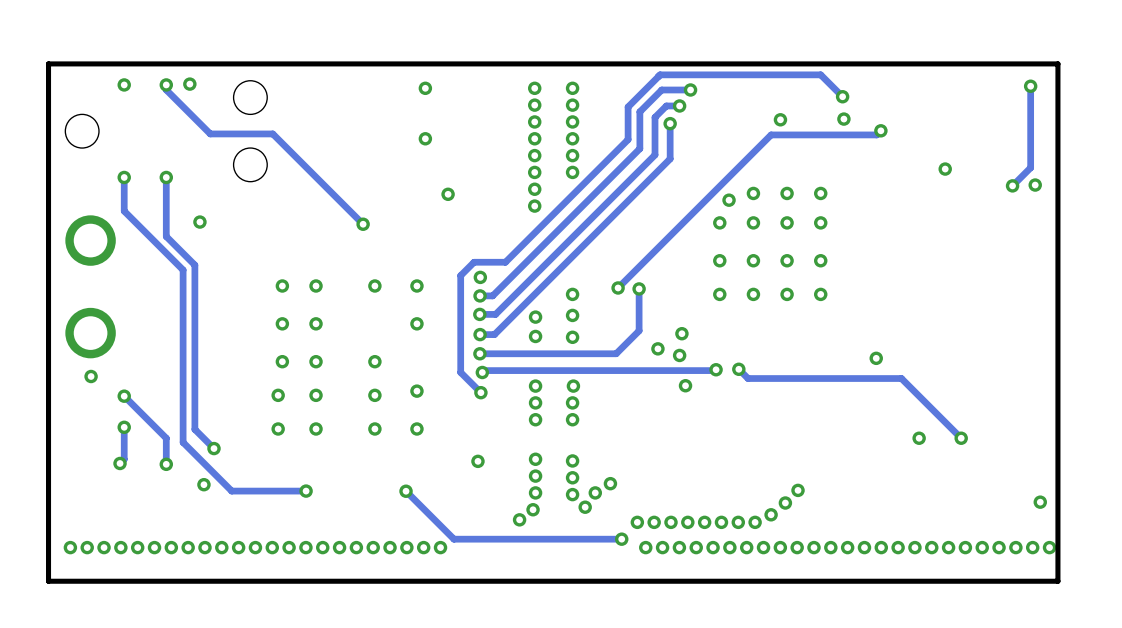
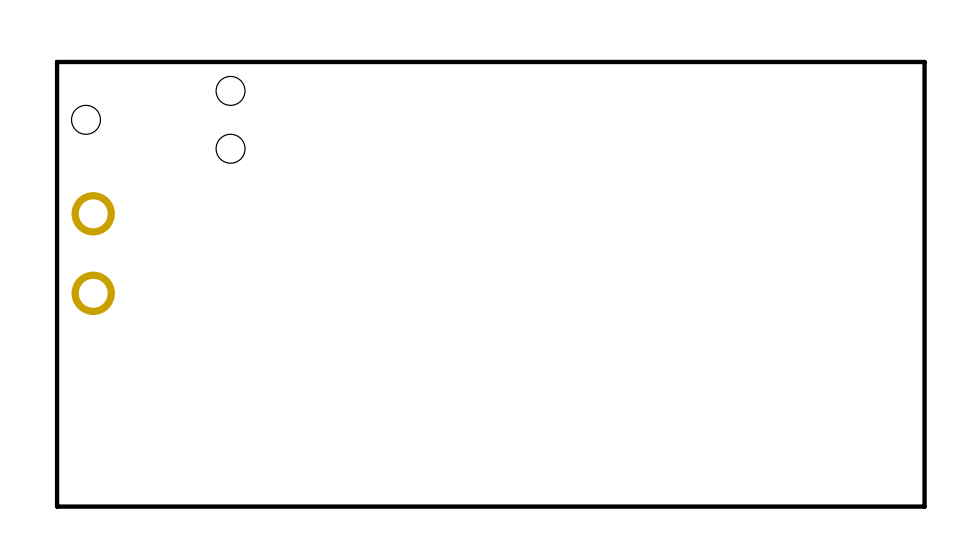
via: (124, 84) -> none
track: (166, 84) (166, 89) (210, 133) (272, 133) (363, 224) -> none
via: (166, 84) -> none
via: (189, 84) -> none
track: (1030, 86) (1030, 167) (1012, 185) -> none
via: (1030, 86) -> none
via: (425, 88) -> none
via: (534, 88) -> none
via: (572, 88) -> none
track: (690, 89) (661, 89) (639, 111) (639, 148) (492, 295) (480, 295) -> none
via: (690, 89) -> none
track: (842, 96) (820, 74) (660, 74) (628, 106) (628, 139) (505, 262) (474, 262) (460, 275) (460, 372) (480, 392) -> none
via: (842, 96) -> none
via: (534, 105) -> none
via: (572, 105) -> none
track: (679, 105) (666, 105) (655, 117) (655, 154) (495, 314) (479, 314) -> none
via: (679, 105) -> none
via: (780, 119) -> none
via: (843, 119) -> none
via: (534, 121) -> none
via: (572, 121) -> none
track: (670, 123) (670, 158) (494, 334) (480, 334) -> none
via: (670, 123) -> none
track: (880, 130) (876, 134) (771, 134) (618, 287) -> none
via: (880, 130) -> none
via: (425, 138) -> none
via: (534, 138) -> none
via: (572, 138) -> none
via: (534, 155) -> none
via: (572, 155) -> none
via: (945, 169) -> none
via: (534, 172) -> none
via: (572, 172) -> none
track: (124, 177) (124, 211) (183, 270) (183, 442) (231, 491) (306, 491) -> none
via: (124, 177) -> none
track: (166, 177) (166, 236) (194, 265) (194, 429) (214, 448) -> none
via: (166, 177) -> none
via: (1012, 185) -> none
via: (1035, 185) -> none
via: (534, 189) -> none
via: (753, 193) -> none
via: (787, 193) -> none
via: (820, 193) -> none
via: (448, 194) -> none
via: (729, 200) -> none
via: (534, 206) -> none
via: (199, 222) -> none
via: (719, 222) -> none
via: (753, 222) -> none
via: (787, 222) -> none
via: (820, 222) -> none
via: (363, 224) -> none
via: (719, 260) -> none
via: (753, 260) -> none
via: (787, 260) -> none
via: (820, 260) -> none
via: (480, 277) -> none
via: (282, 285) -> none
via: (316, 285) -> none
via: (374, 285) -> none
via: (416, 285) -> none
via: (618, 287) -> none
track: (639, 288) (639, 330) (616, 353) (479, 353) -> none
via: (639, 288) -> none
via: (572, 294) -> none
via: (719, 294) -> none
via: (753, 294) -> none
via: (787, 294) -> none
via: (820, 294) -> none
via: (480, 295) -> none
via: (479, 314) -> none
via: (572, 315) -> none
via: (535, 317) -> none
via: (282, 323) -> none
via: (316, 323) -> none
via: (416, 323) -> none
via: (681, 333) -> none
via: (480, 334) -> none
via: (535, 336) -> none
via: (572, 337) -> none
via: (657, 348) -> none
via: (479, 353) -> none
via: (679, 355) -> none
via: (876, 358) -> none
via: (282, 361) -> none
via: (316, 361) -> none
via: (374, 361) -> none
track: (716, 369) (480, 370) (482, 372) -> none
via: (716, 369) -> none
track: (738, 369) (748, 378) (901, 378) (961, 438) -> none
via: (738, 369) -> none
via: (482, 372) -> none
via: (91, 376) -> none
via: (685, 385) -> none
via: (535, 386) -> none
via: (573, 386) -> none
via: (416, 391) -> none
via: (480, 392) -> none
via: (278, 395) -> none
via: (316, 395) -> none
via: (374, 395) -> none
track: (124, 396) (166, 438) (166, 464) -> none
via: (124, 396) -> none
via: (535, 402) -> none
via: (572, 402) -> none
via: (535, 419) -> none
via: (572, 419) -> none
track: (124, 427) (124, 459) (120, 463) -> none
via: (124, 427) -> none
via: (278, 428) -> none
via: (316, 428) -> none
via: (374, 428) -> none
via: (416, 428) -> none
via: (919, 438) -> none
via: (961, 438) -> none
via: (214, 448) -> none
via: (535, 459) -> none
via: (572, 460) -> none
via: (477, 461) -> none
via: (120, 463) -> none
via: (166, 464) -> none
via: (535, 476) -> none
via: (572, 477) -> none
via: (610, 483) -> none
via: (203, 484) -> none
via: (798, 490) -> none
via: (306, 491) -> none
track: (406, 491) (453, 539) (621, 539) -> none
via: (406, 491) -> none
via: (535, 492) -> none
via: (595, 492) -> none
via: (572, 494) -> none
via: (1040, 502) -> none
via: (785, 503) -> none
via: (585, 507) -> none
via: (533, 509) -> none
via: (771, 514) -> none
via: (519, 519) -> none
via: (637, 522) -> none
via: (654, 522) -> none
via: (670, 522) -> none
via: (687, 522) -> none
via: (704, 522) -> none
via: (721, 522) -> none
via: (738, 522) -> none
via: (755, 522) -> none
via: (621, 539) -> none
via: (70, 547) -> none
via: (87, 547) -> none
via: (104, 547) -> none
via: (120, 547) -> none
via: (137, 547) -> none
via: (154, 547) -> none
via: (171, 547) -> none
via: (188, 547) -> none
via: (204, 547) -> none
via: (221, 547) -> none
via: (238, 547) -> none
via: (255, 547) -> none
via: (272, 547) -> none
via: (289, 547) -> none
via: (305, 547) -> none
via: (322, 547) -> none
via: (339, 547) -> none
via: (356, 547) -> none
via: (373, 547) -> none
via: (390, 547) -> none
via: (406, 547) -> none
via: (423, 547) -> none
via: (440, 547) -> none
via: (645, 547) -> none
via: (662, 547) -> none
via: (679, 547) -> none
via: (696, 547) -> none
via: (713, 547) -> none
via: (729, 547) -> none
via: (746, 547) -> none
via: (763, 547) -> none
via: (780, 547) -> none
via: (797, 547) -> none
via: (814, 547) -> none
via: (830, 547) -> none
via: (847, 547) -> none
via: (864, 547) -> none
via: (881, 547) -> none
via: (898, 547) -> none
via: (914, 547) -> none
via: (931, 547) -> none
via: (948, 547) -> none
via: (965, 547) -> none
via: (982, 547) -> none
via: (999, 547) -> none
via: (1015, 547) -> none
via: (1032, 547) -> none
via: (1049, 547) -> none

